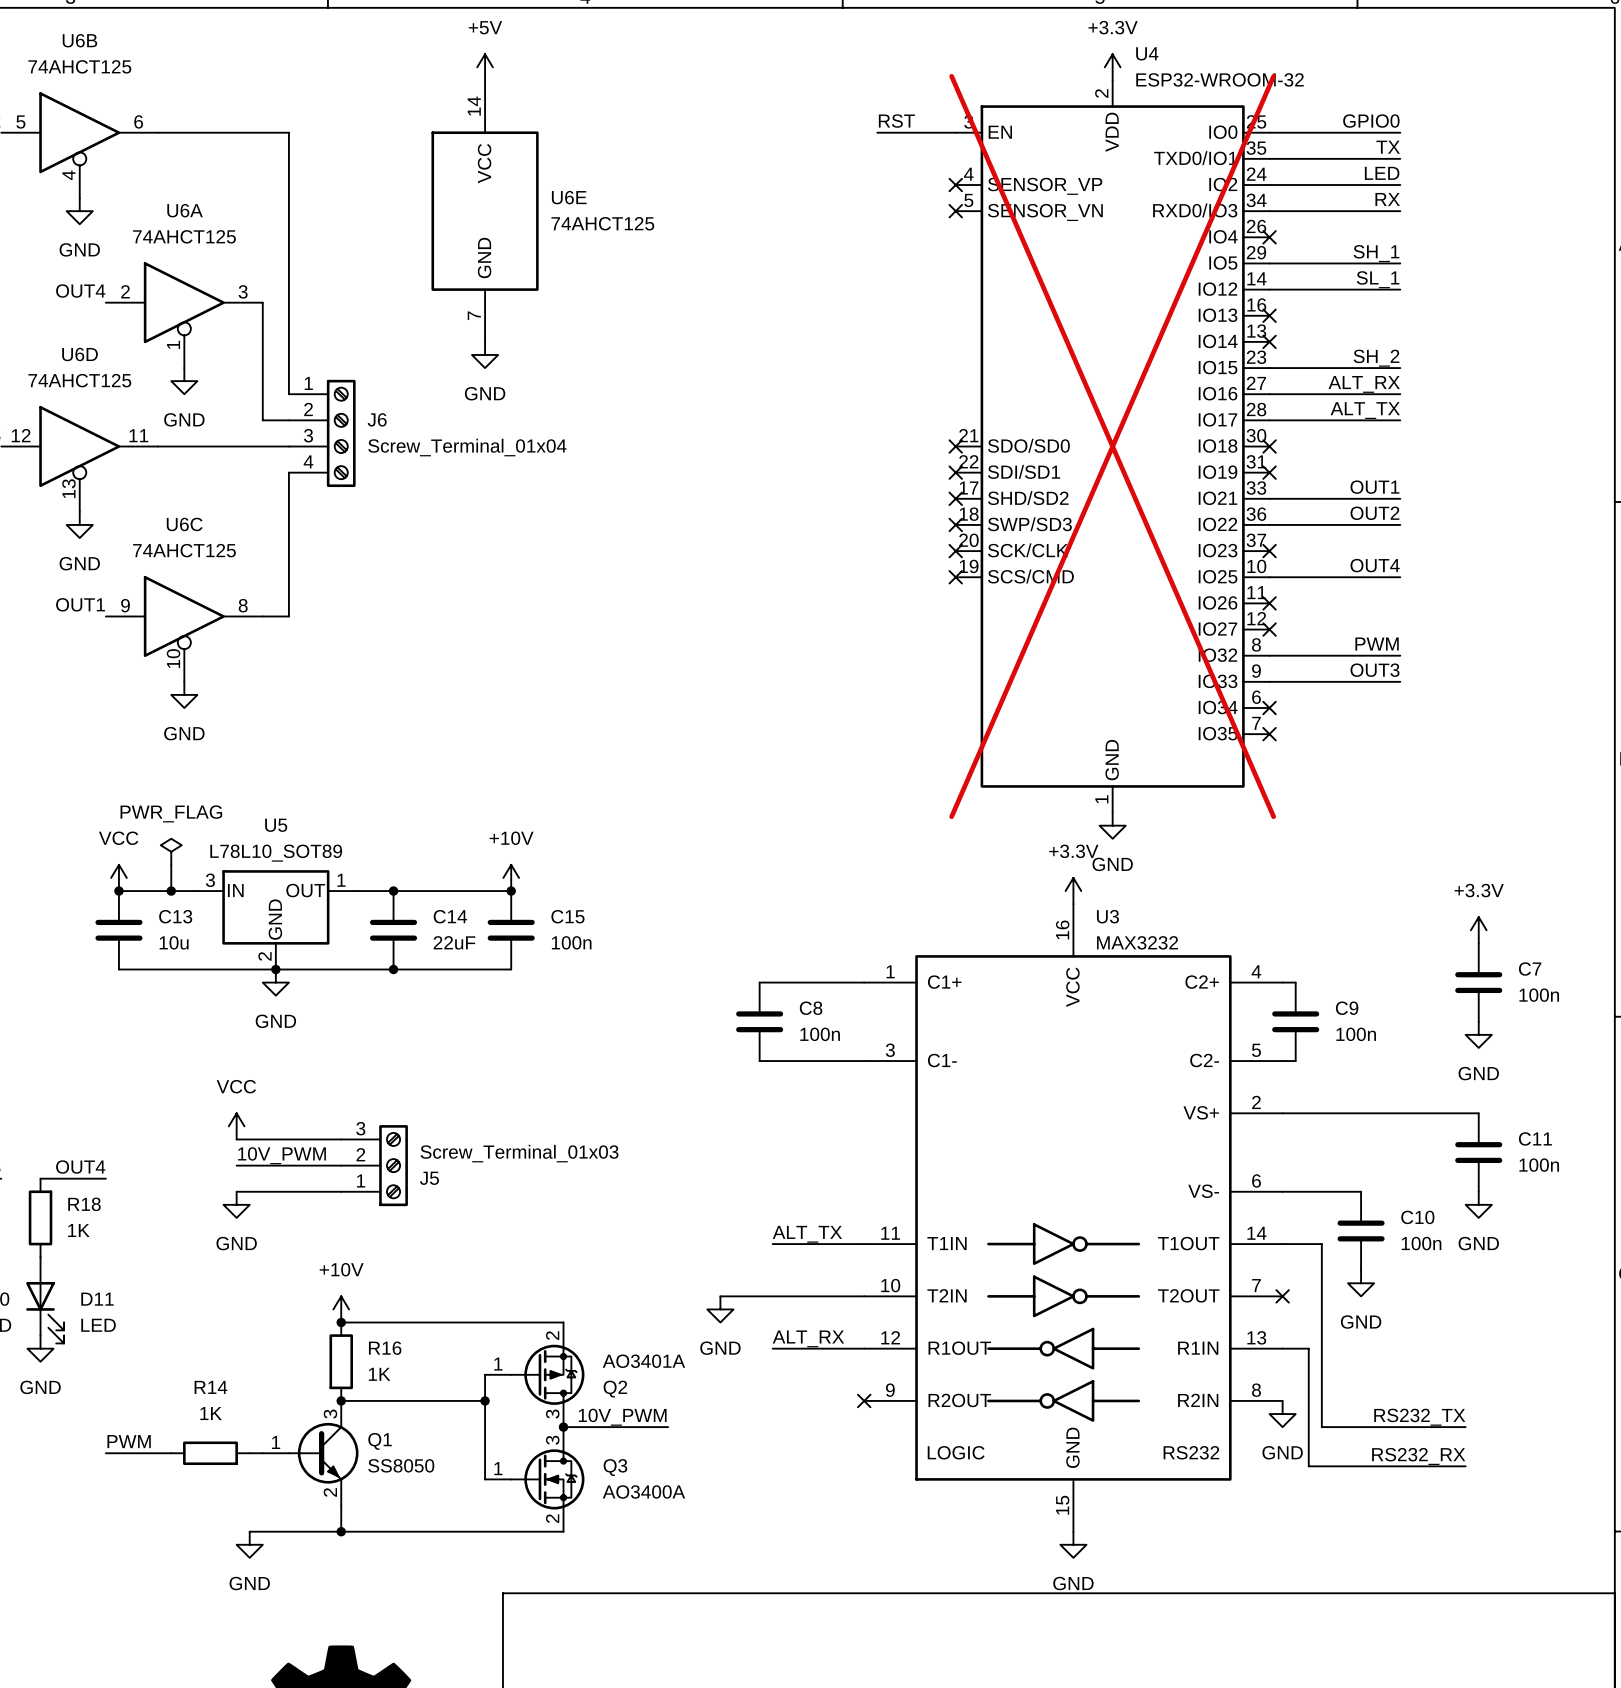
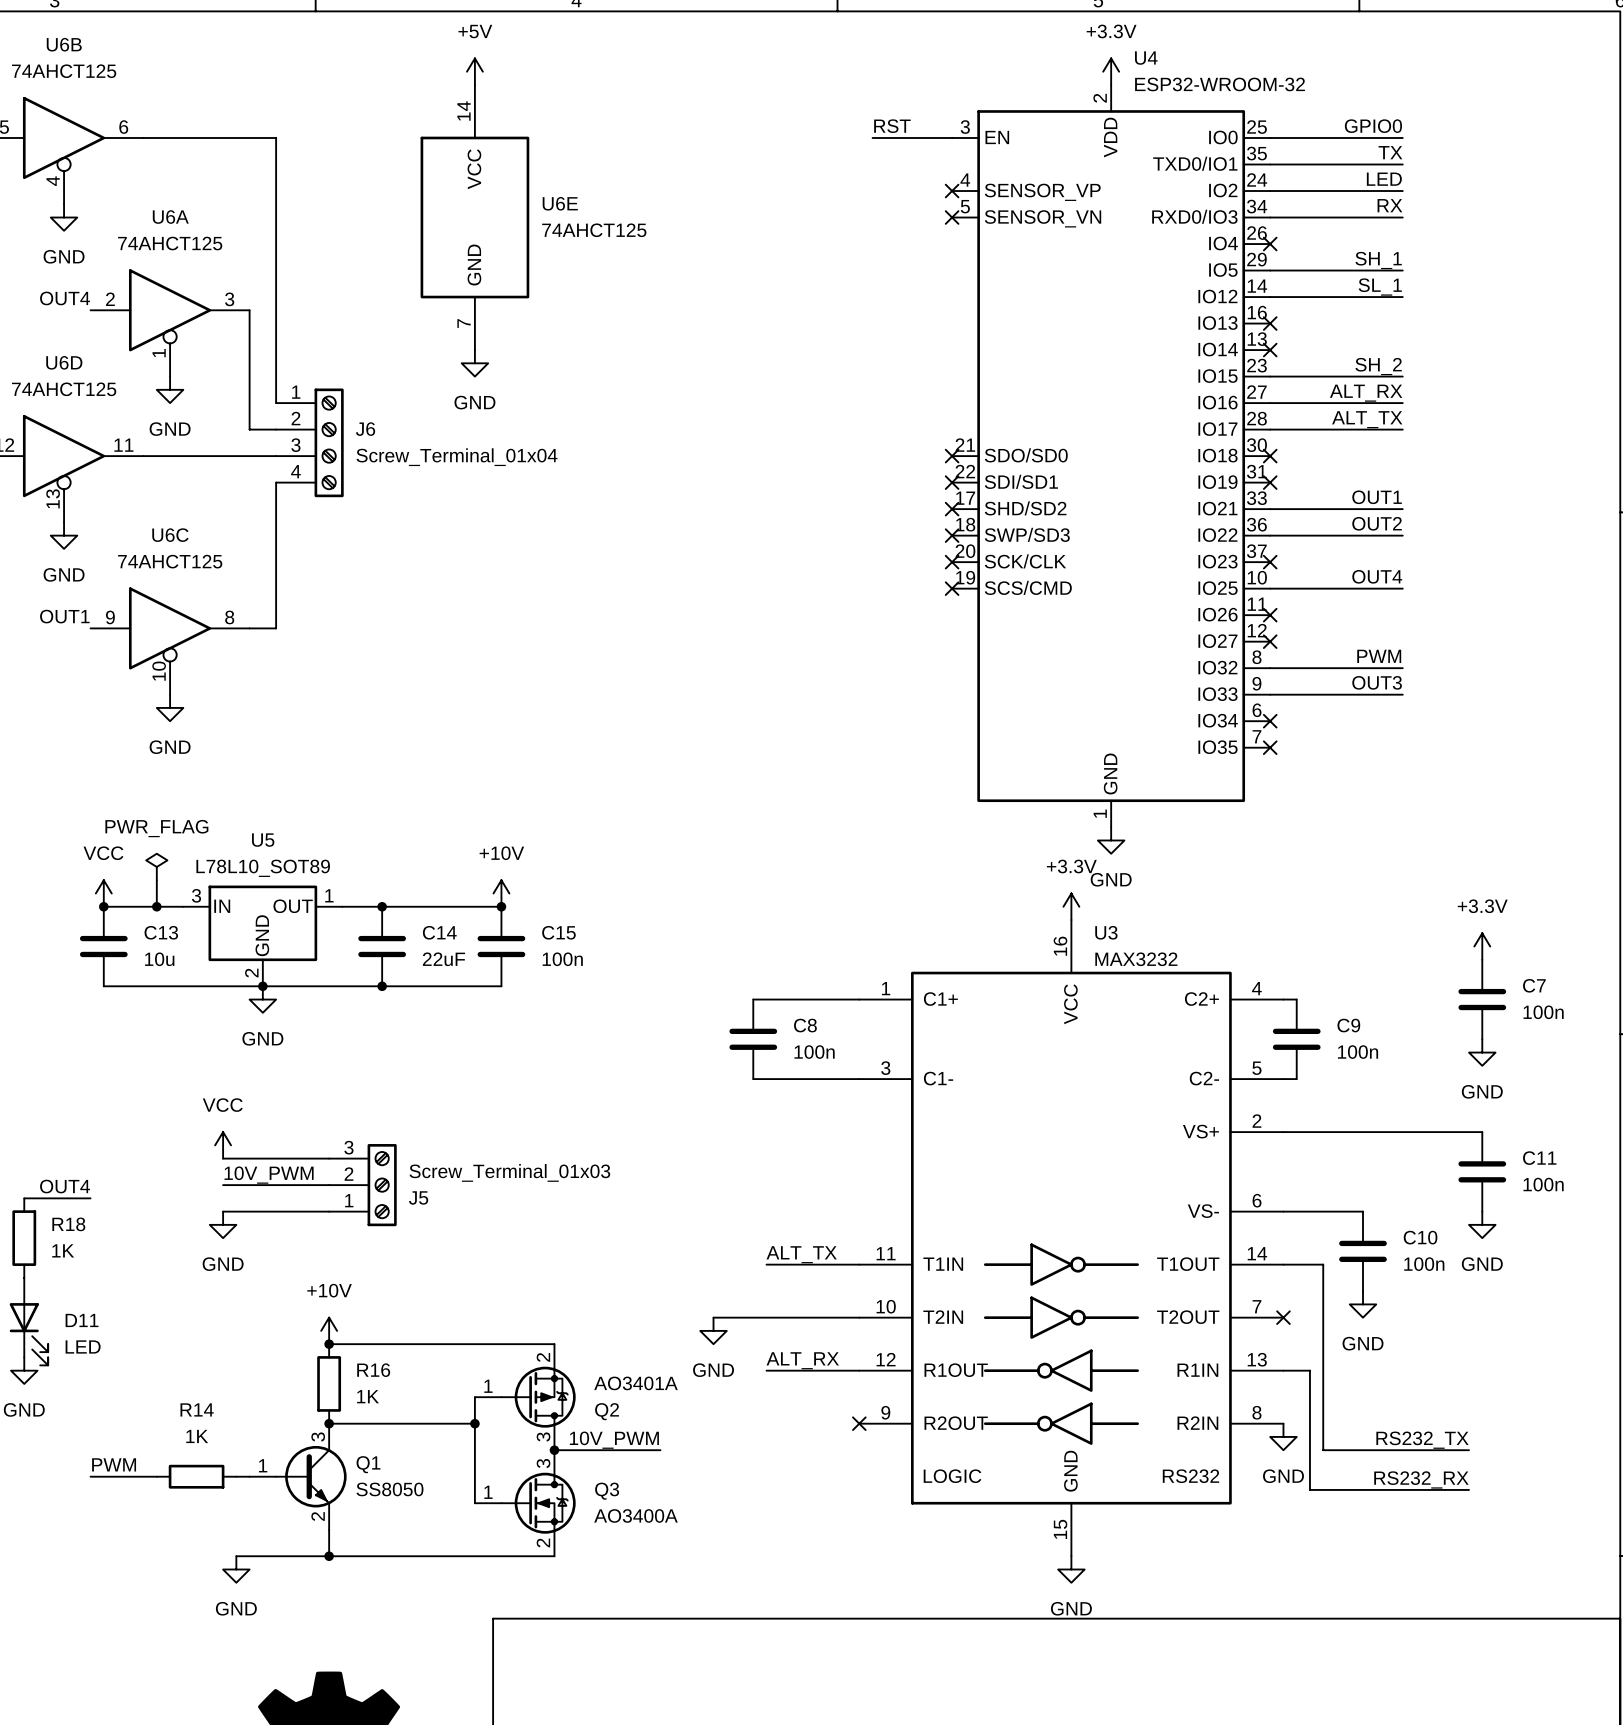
U4 do-not-place cross: (1112, 446) -> none

